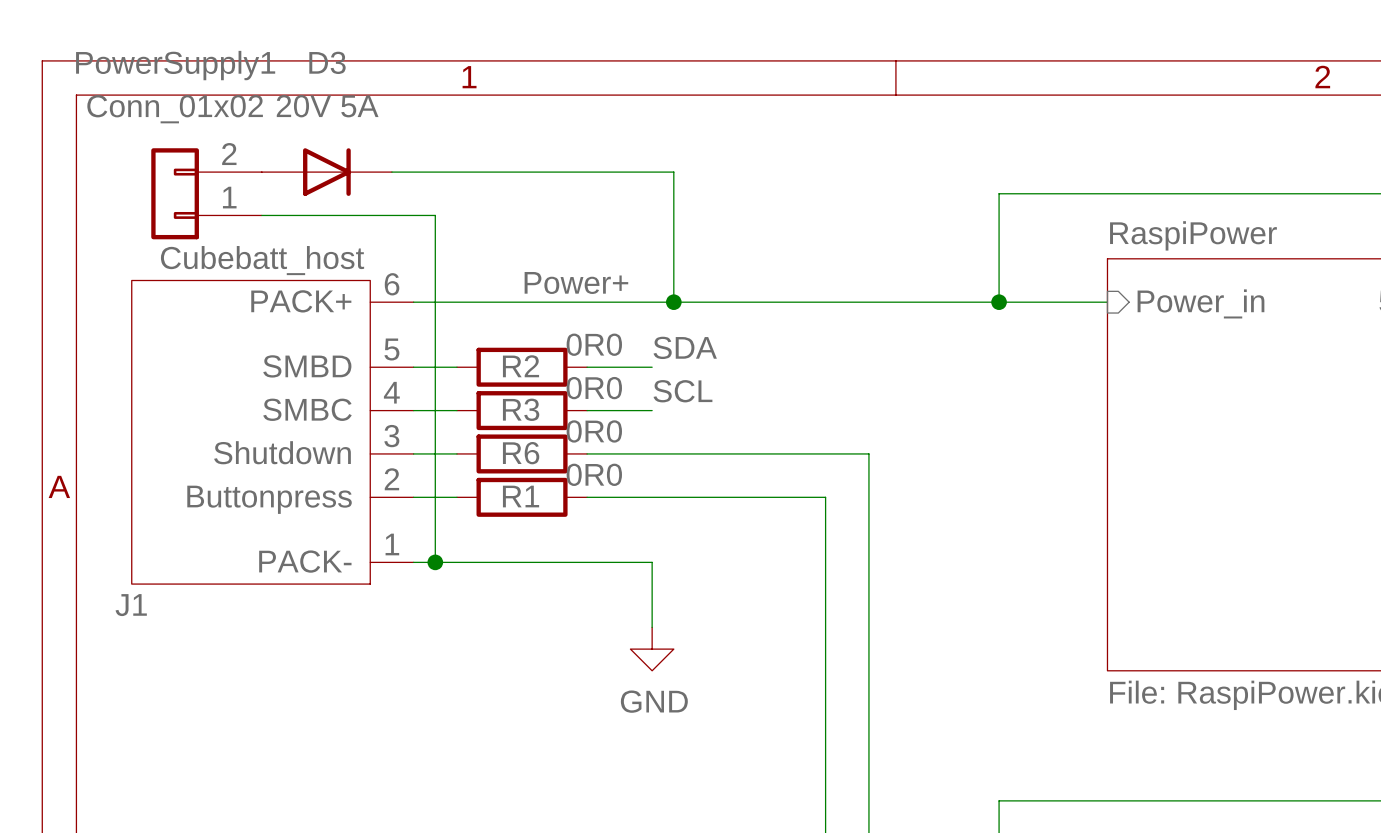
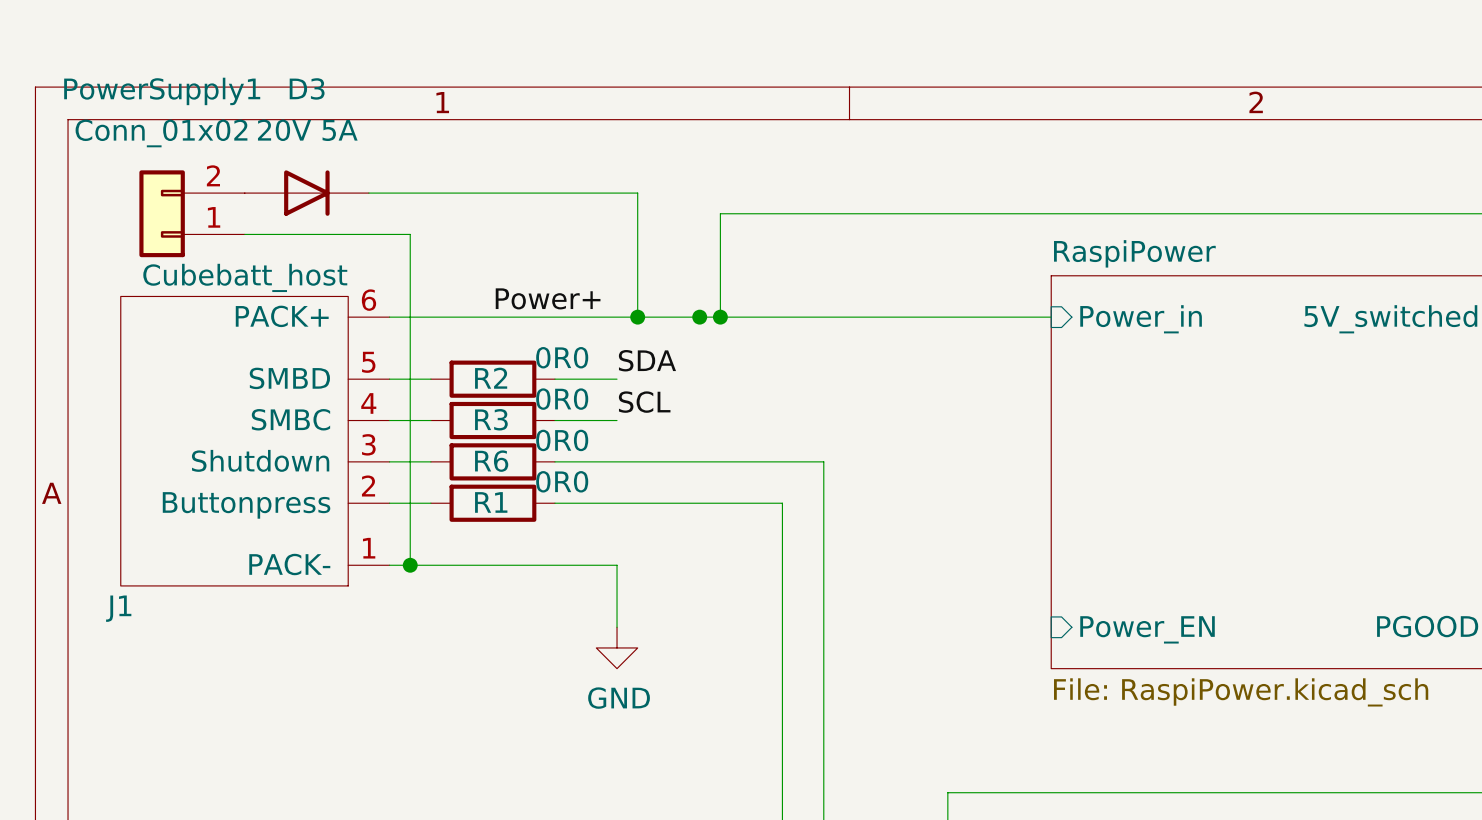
wire: (999, 193) (999, 302) -> (947, 213) (720, 213) (720, 317)
junction: none -> (699, 317)
junction: none -> (720, 317)
junction: (999, 302) -> none
sheet pin: none -> Power_EN (1147, 629)

